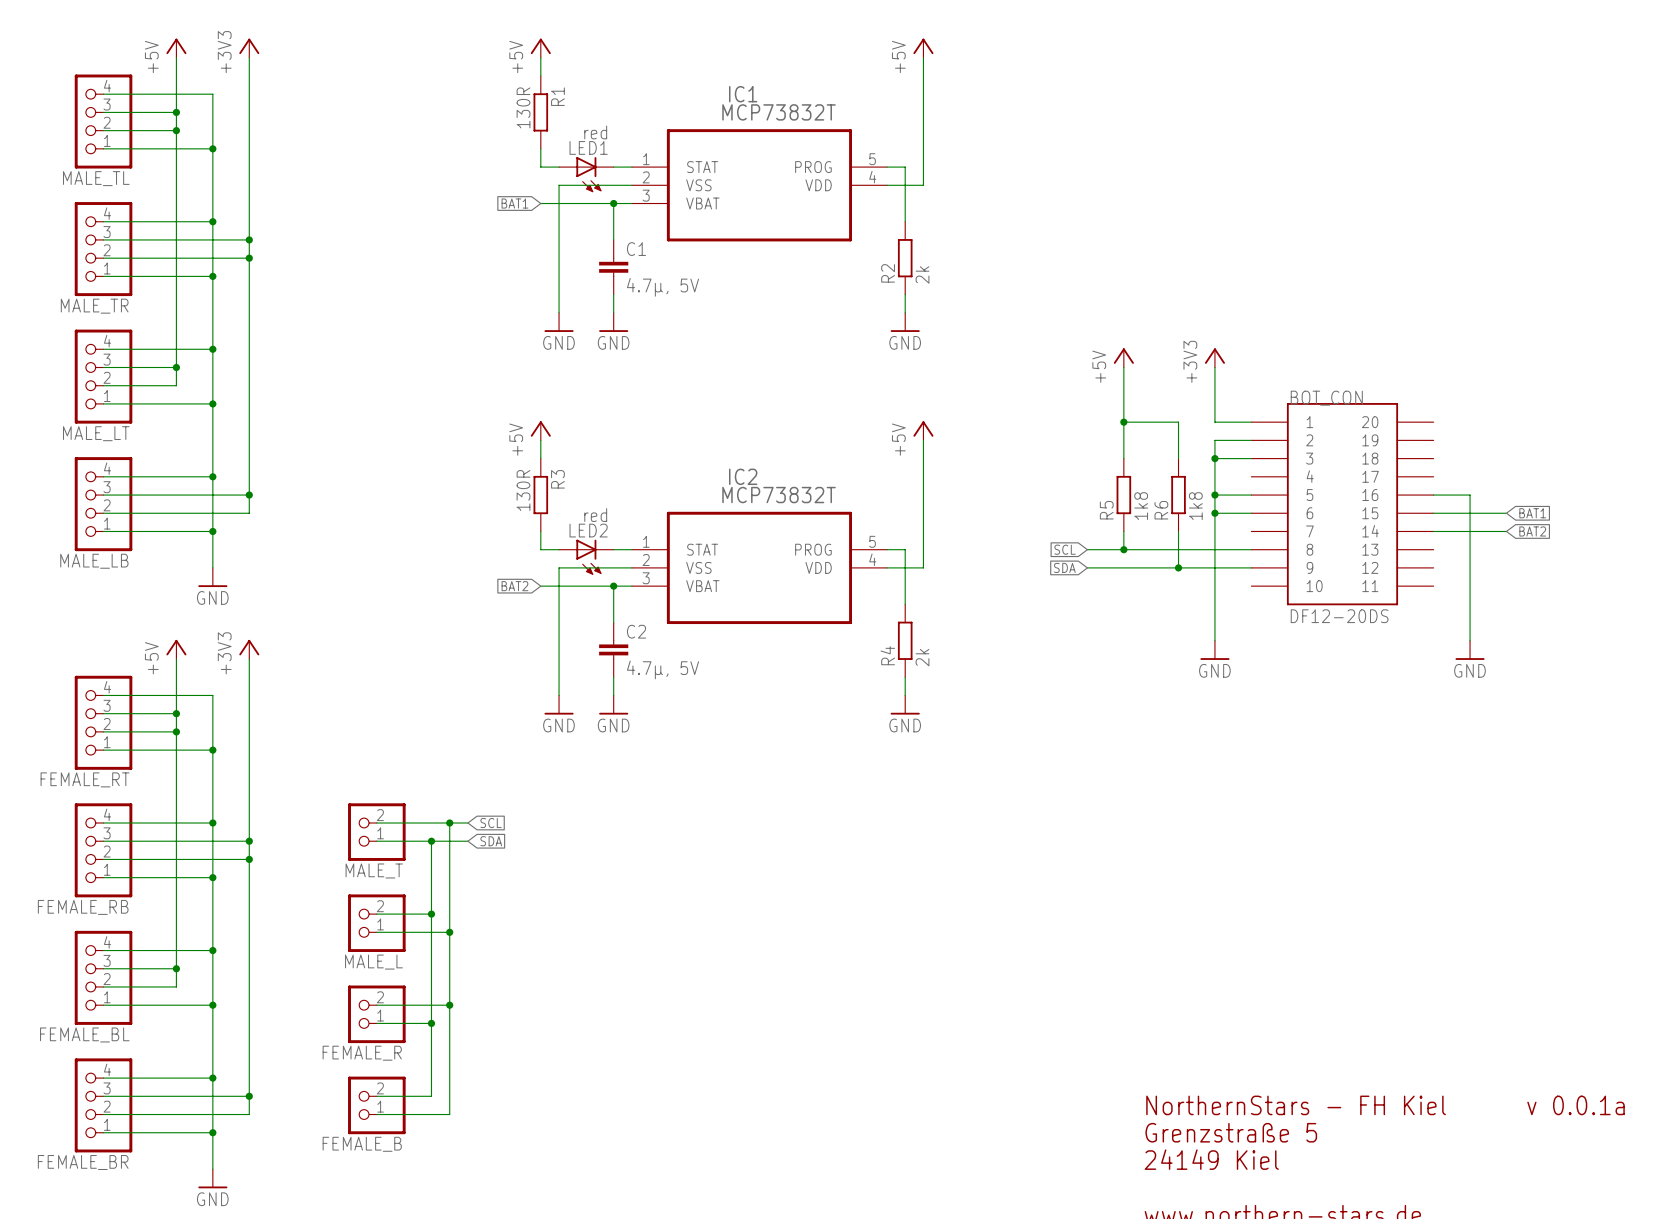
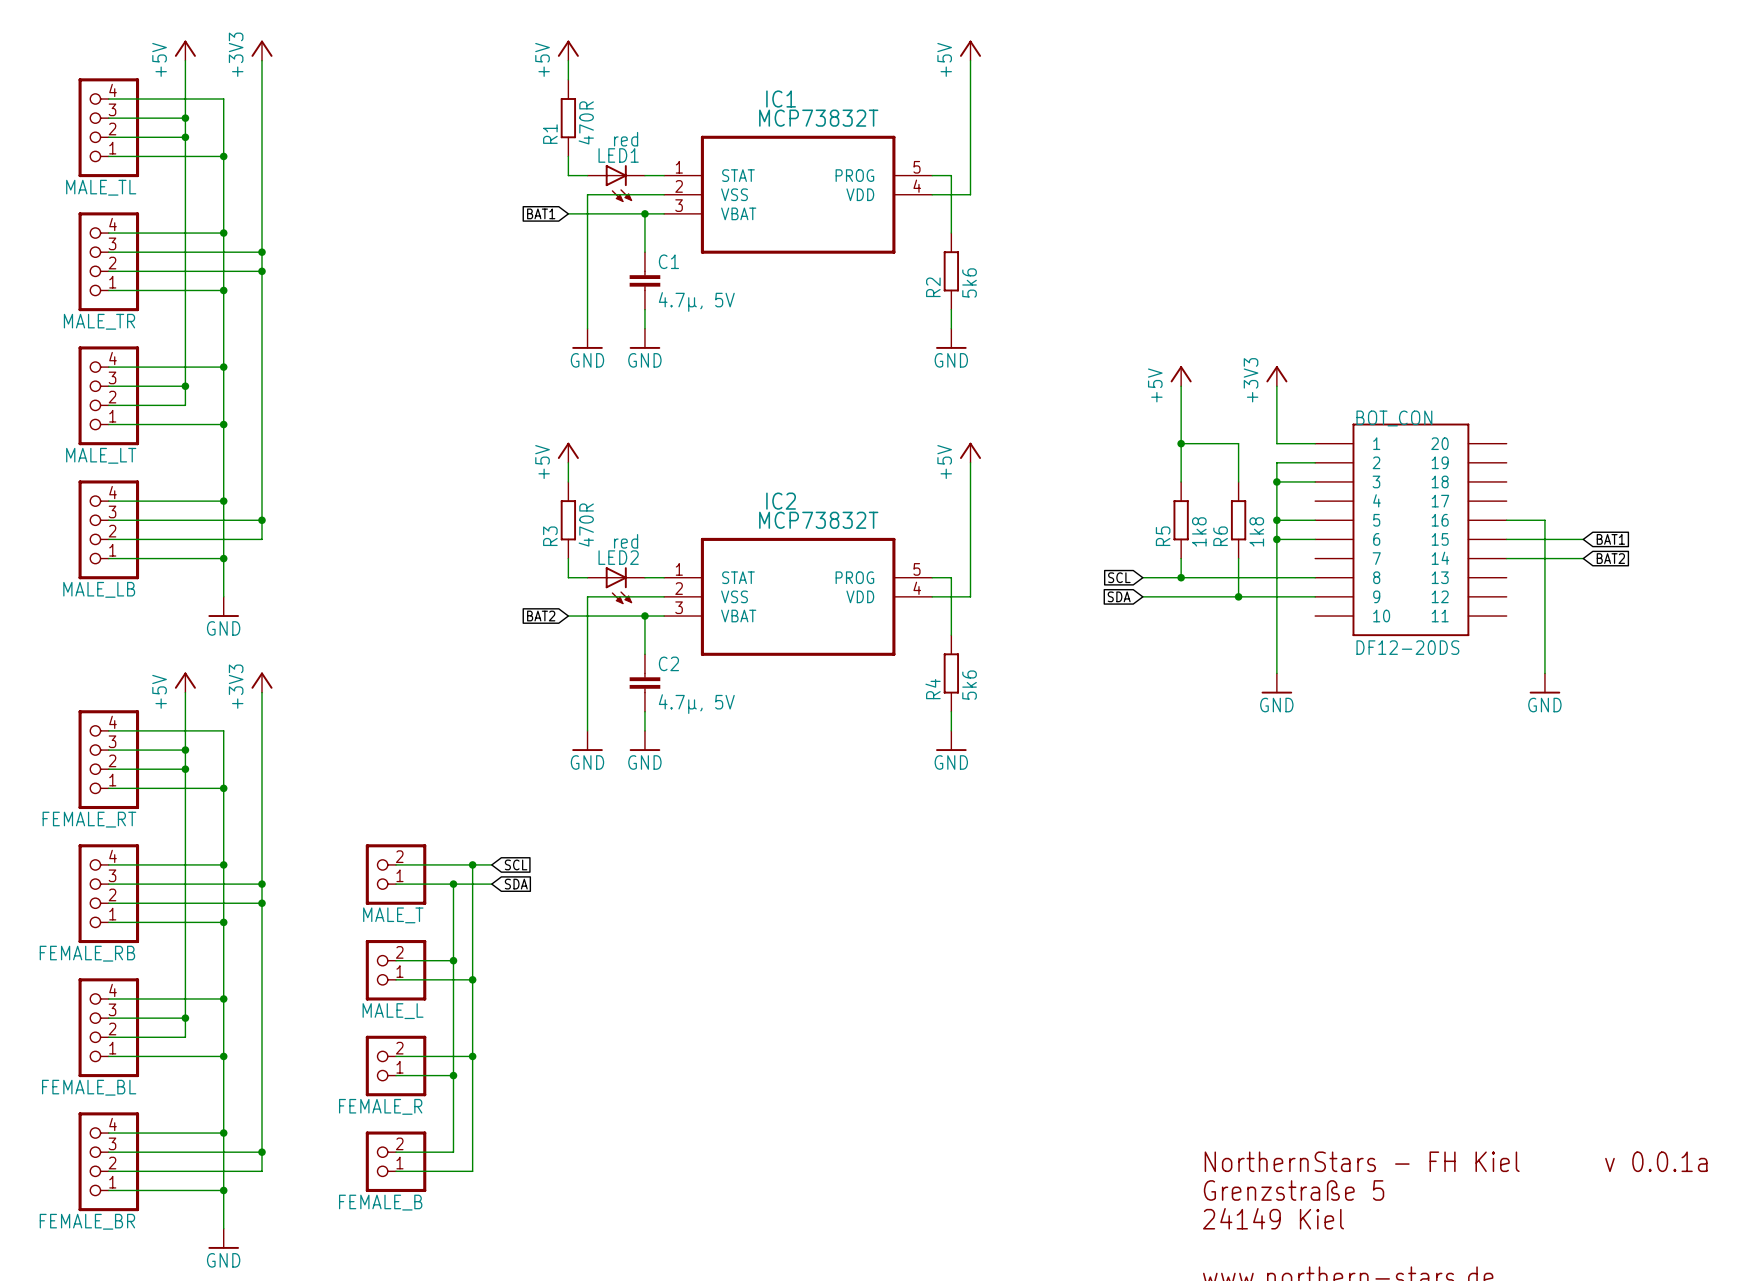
R1 name position: R1 (557, 96) -> R1 (550, 134)
R1 value: 130R (523, 107) -> 470R (586, 122)
R2 value: 2k (922, 274) -> 5k6 (969, 282)
R3 name position: R3 (557, 479) -> R3 (550, 536)
R3 value: 130R (523, 490) -> 470R (586, 525)
R4 value: 2k (922, 657) -> 5k6 (969, 685)

